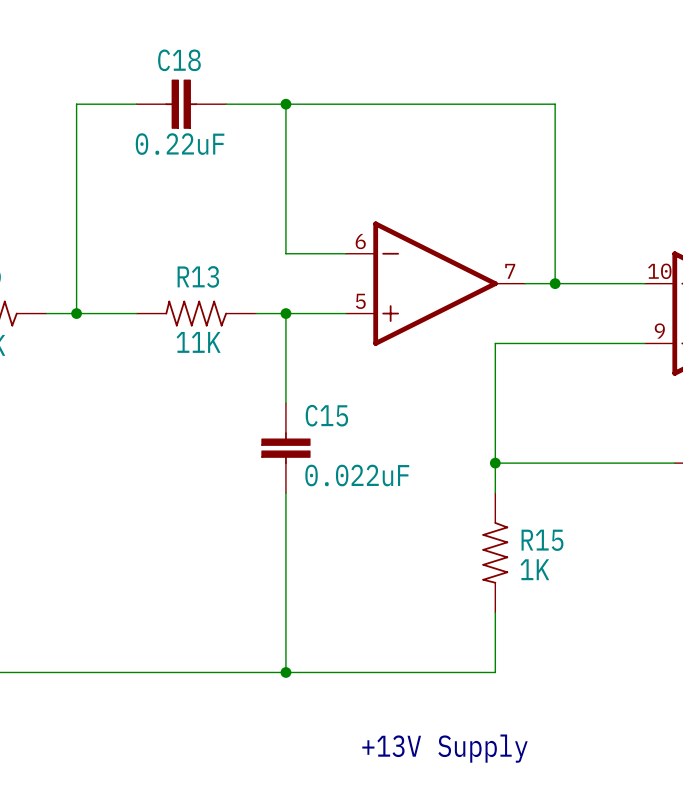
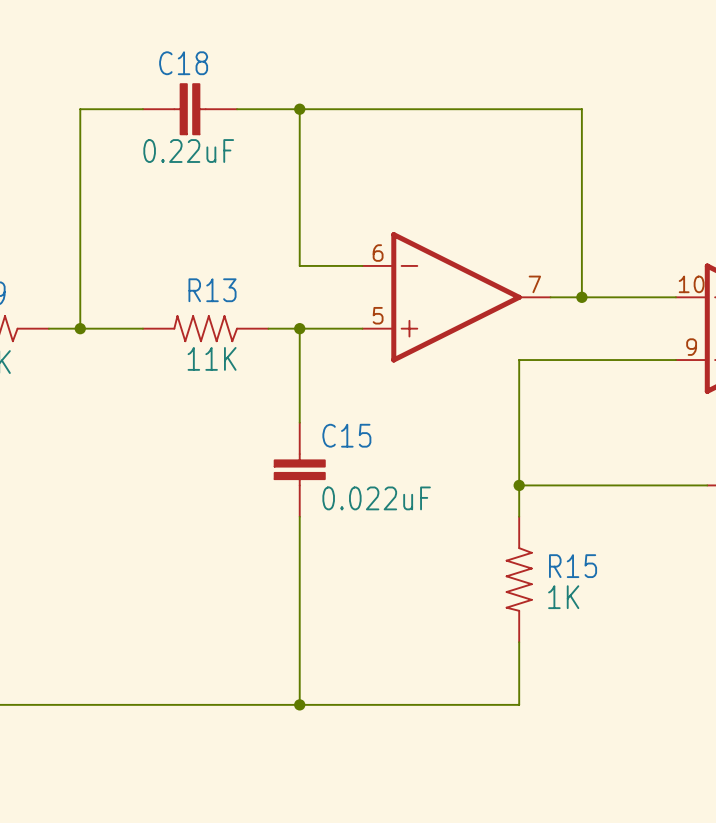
text: +13V Supply (444, 748) -> none

